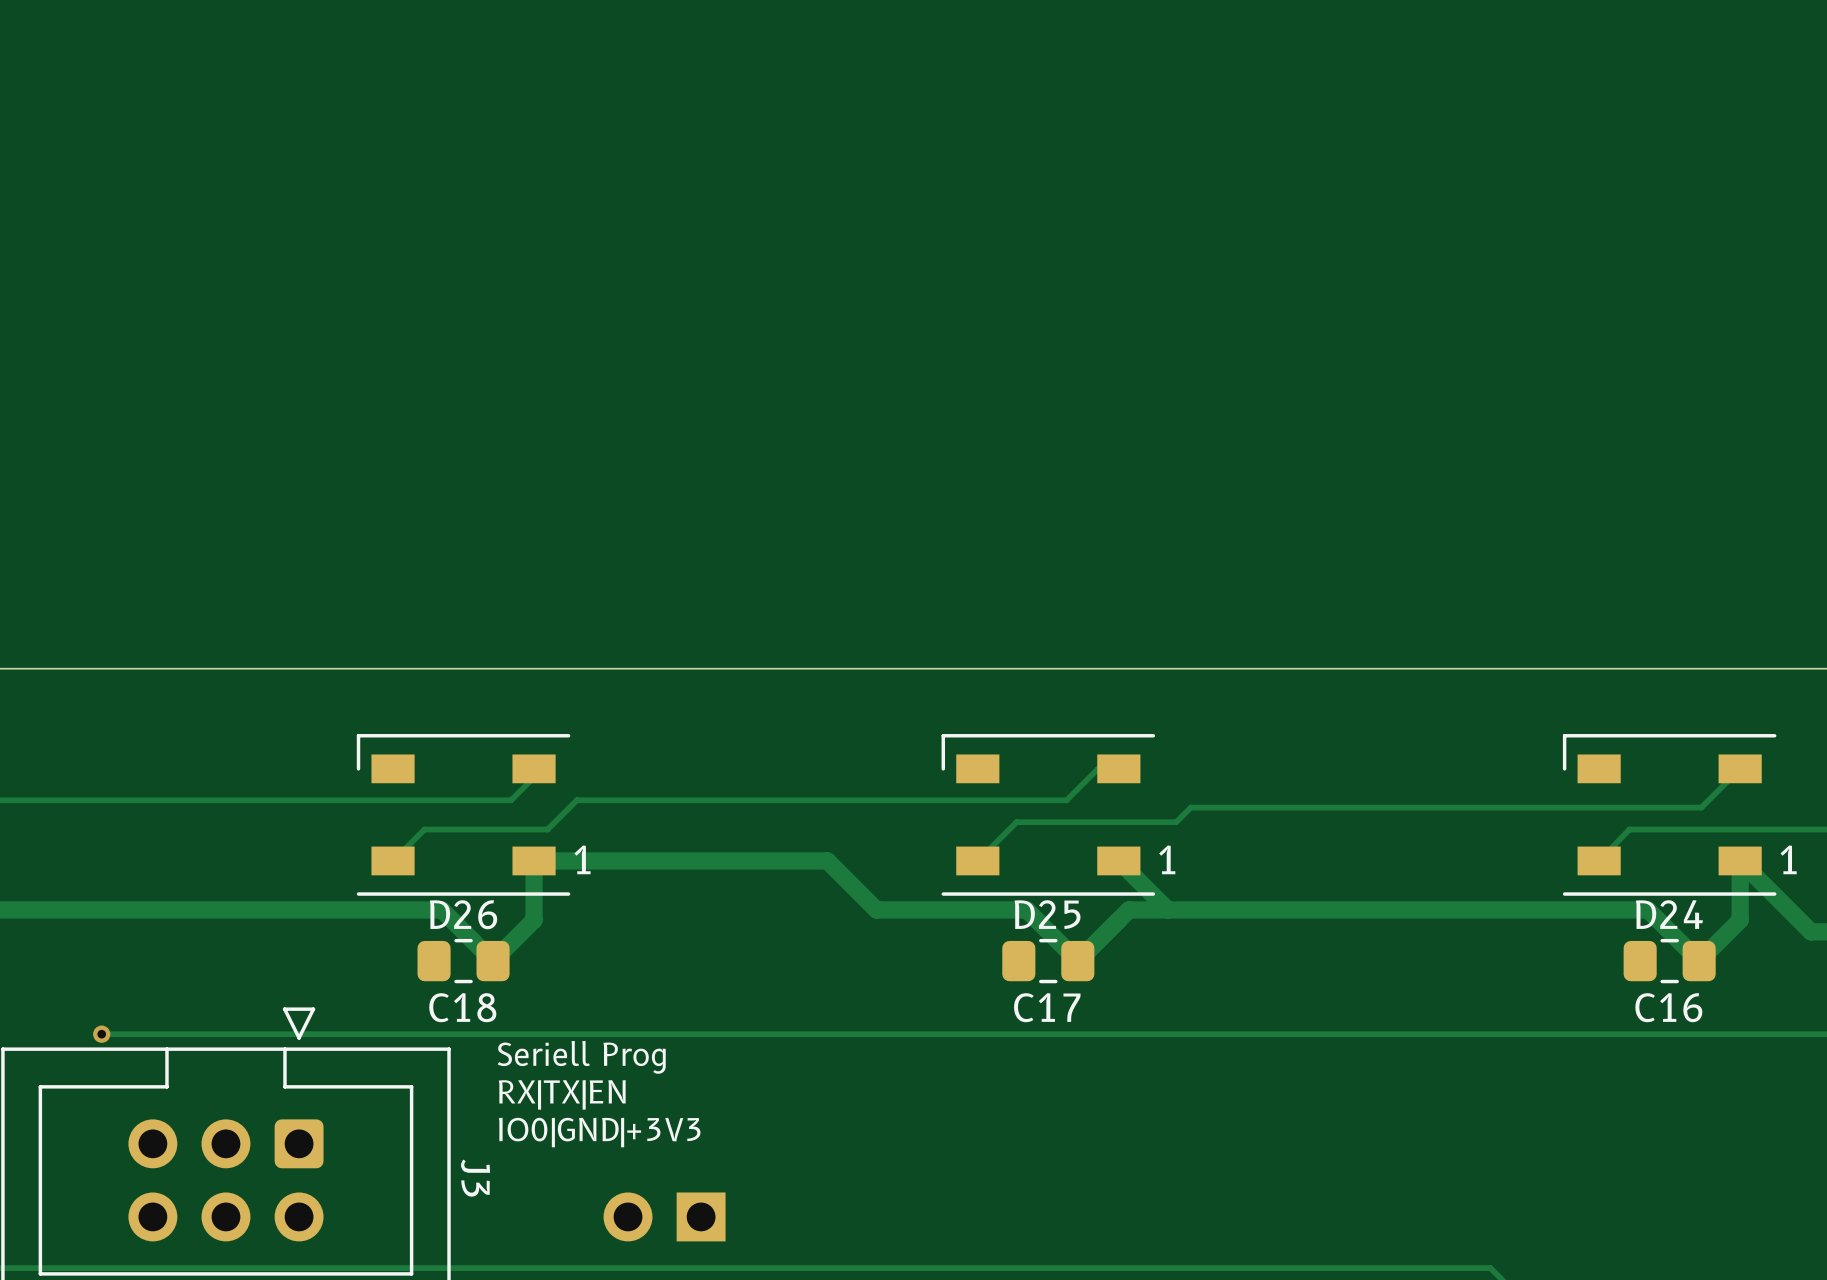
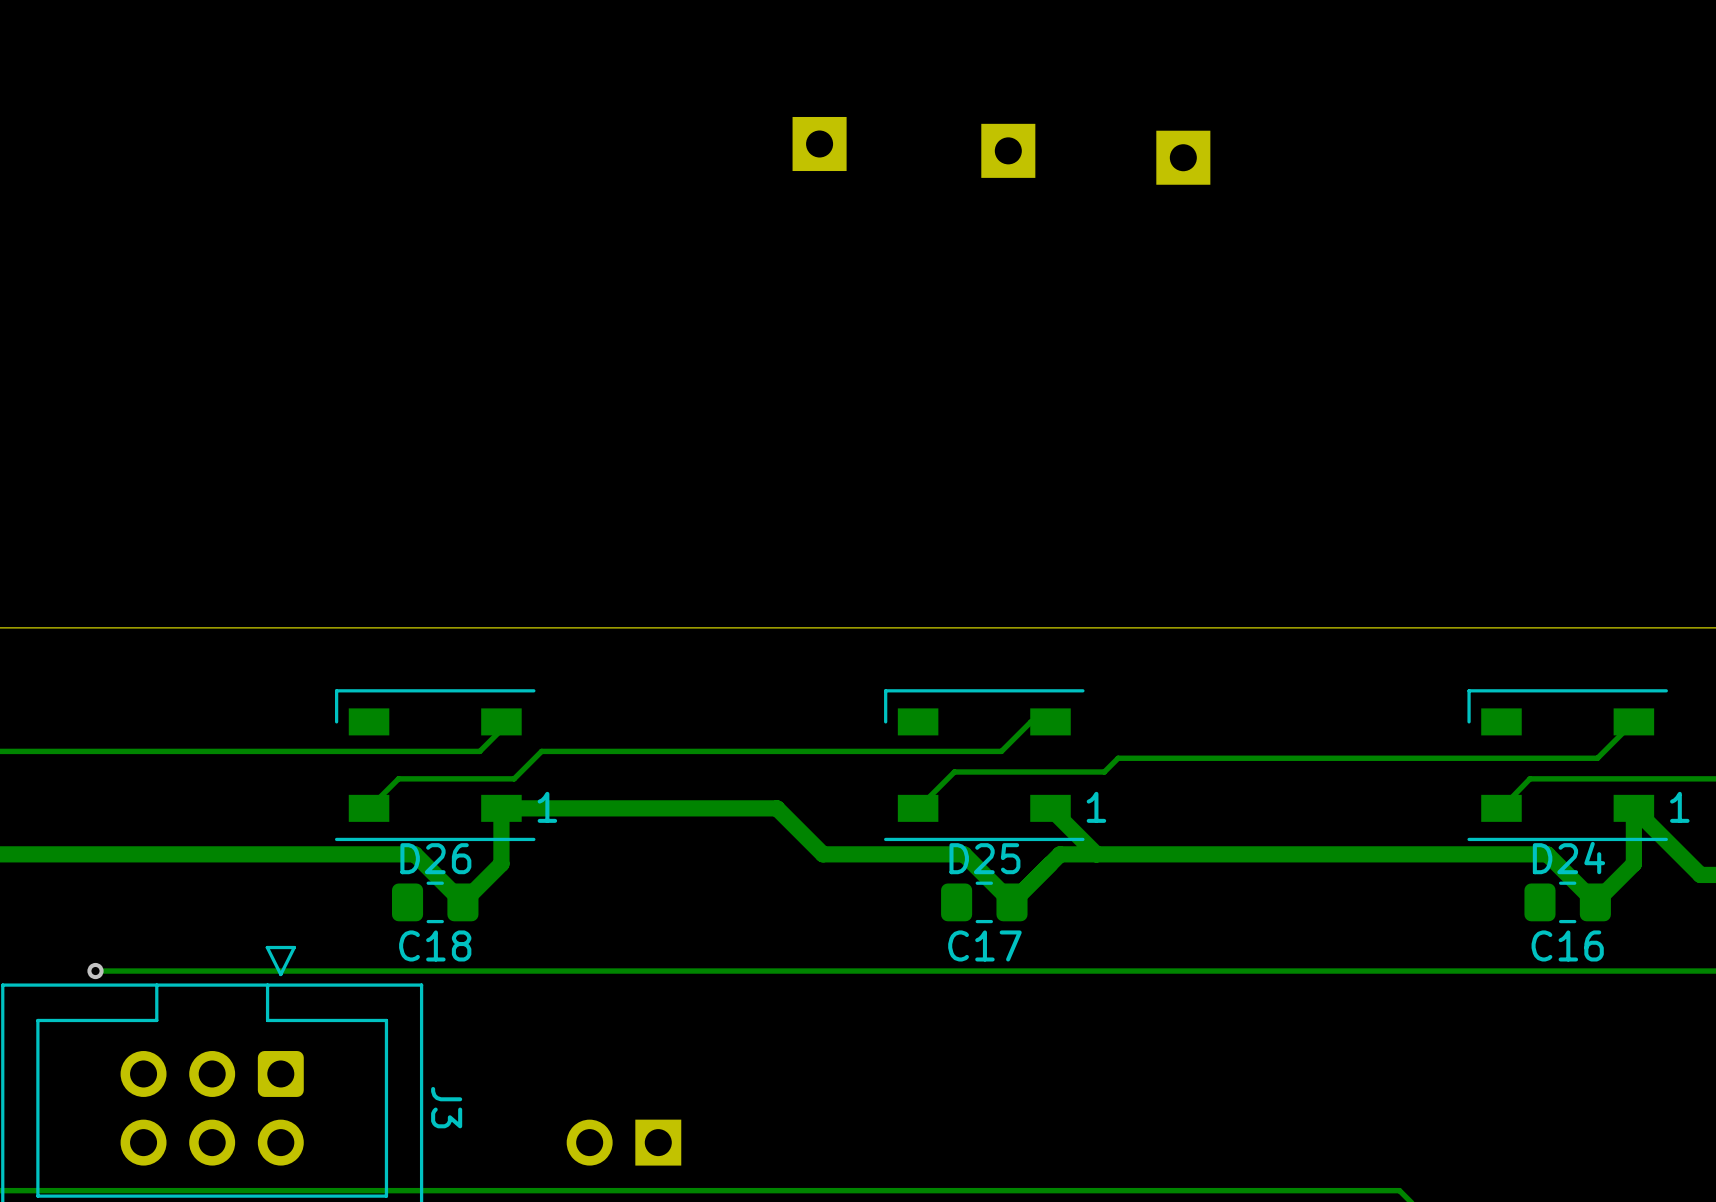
part: none -> (819, 144)
part: none -> (1008, 150)
part: none -> (1183, 157)
text: Seriell Prog (581, 1057) -> none
text: RX|TX|EN (562, 1094) -> none
text: IO0|GND|+3V3 (599, 1132) -> none

